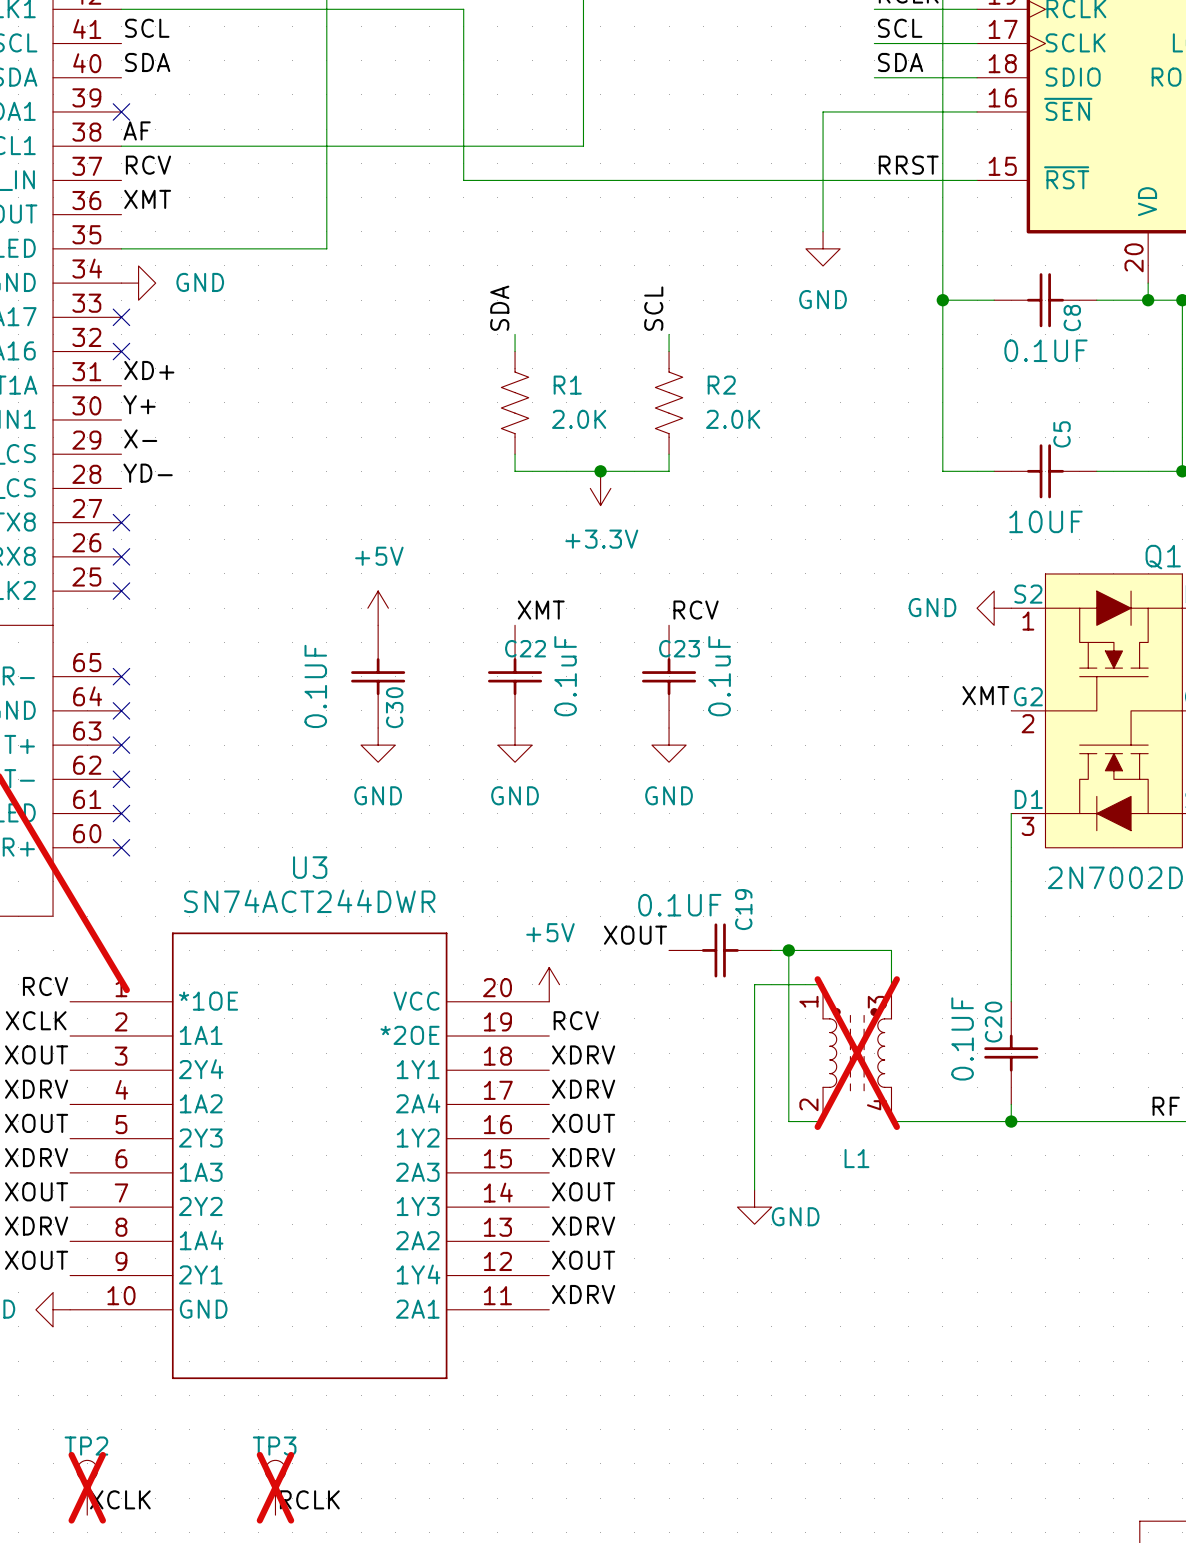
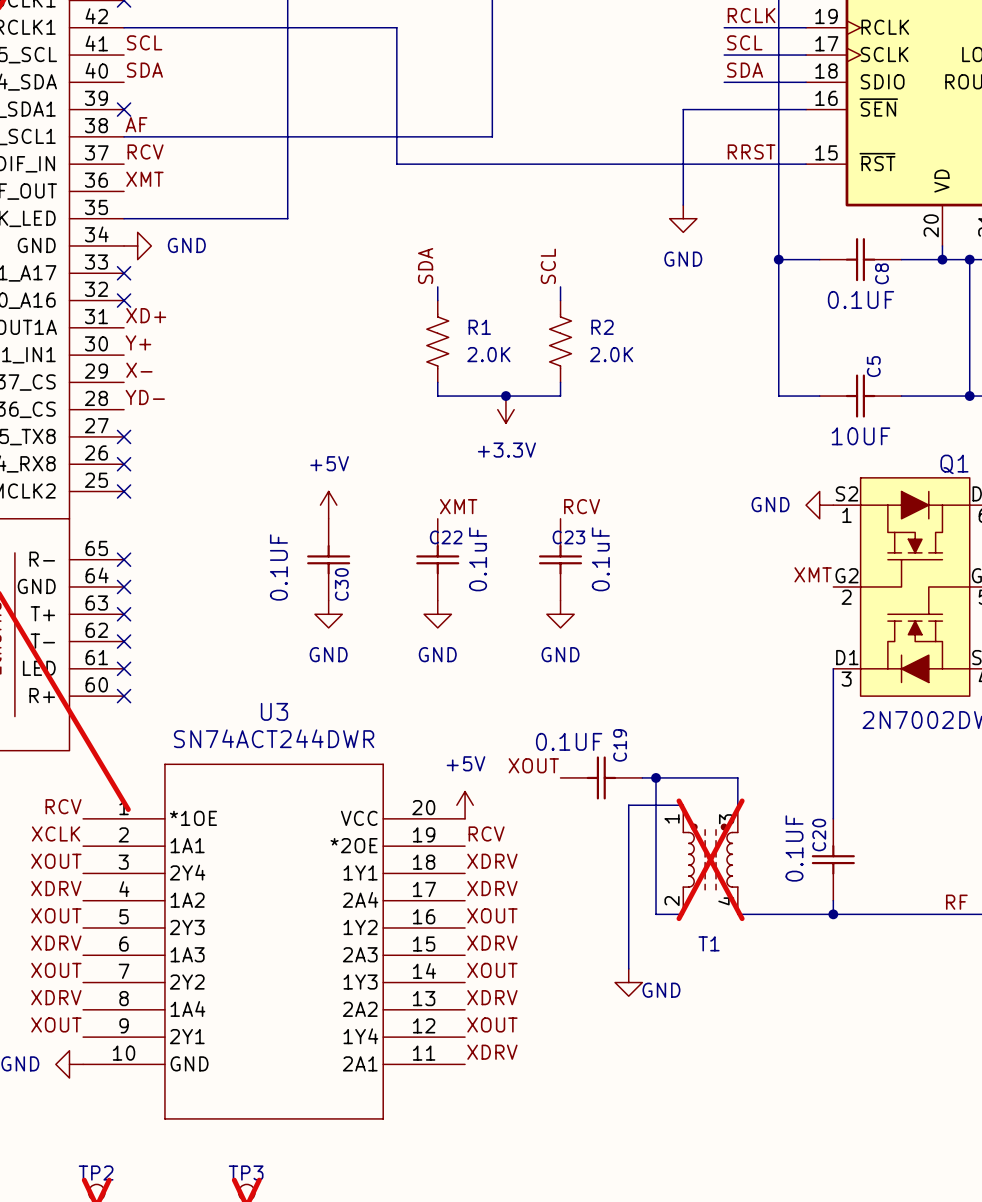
L1 name: L1 (856, 1158) -> T1 (709, 943)

